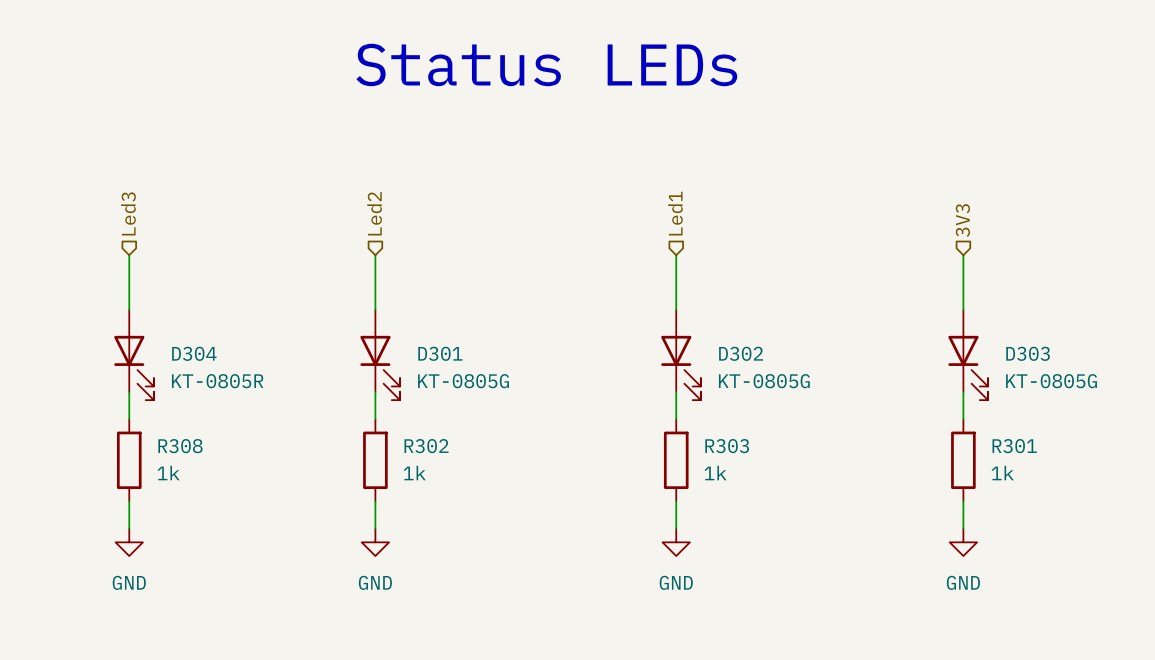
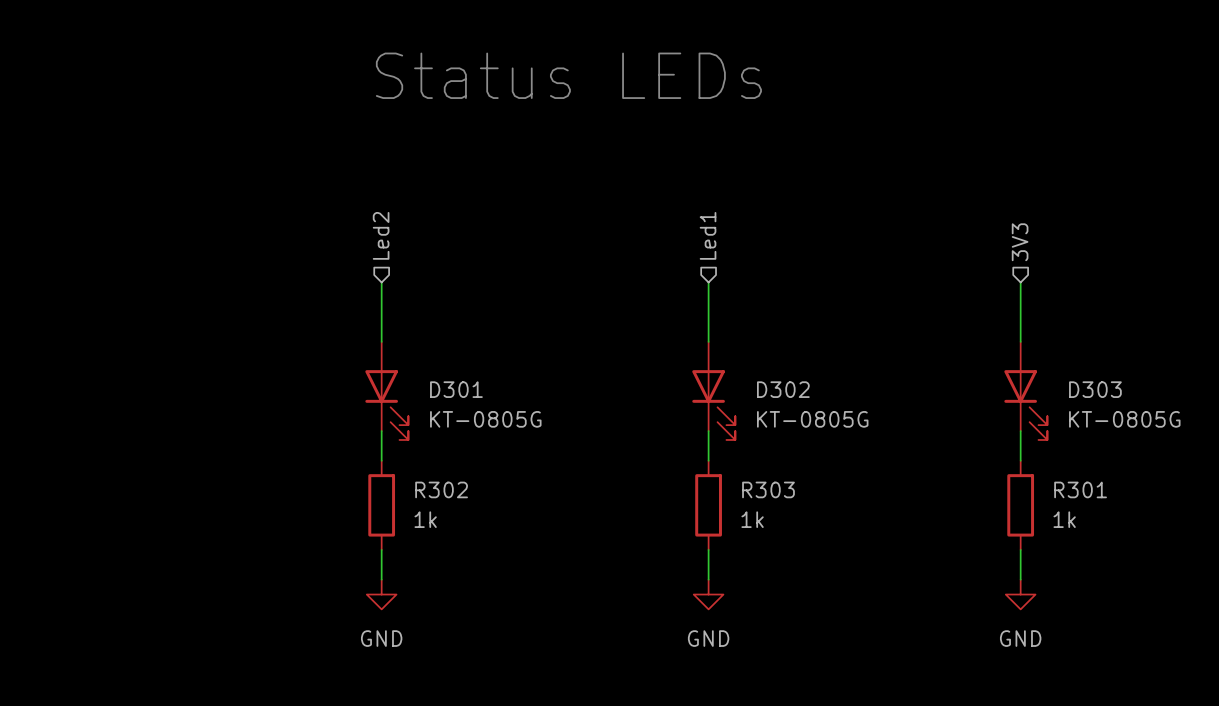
hierarchical label: Led3 (128, 213) -> none
wire: (129, 255) (129, 309) -> none
D304: KT-0805R (134, 355) -> none
wire: (129, 391) (129, 419) -> none
R308: 1k (129, 460) -> none
wire: (129, 501) (129, 528) -> none
power symbol: GND (129, 542) -> none

